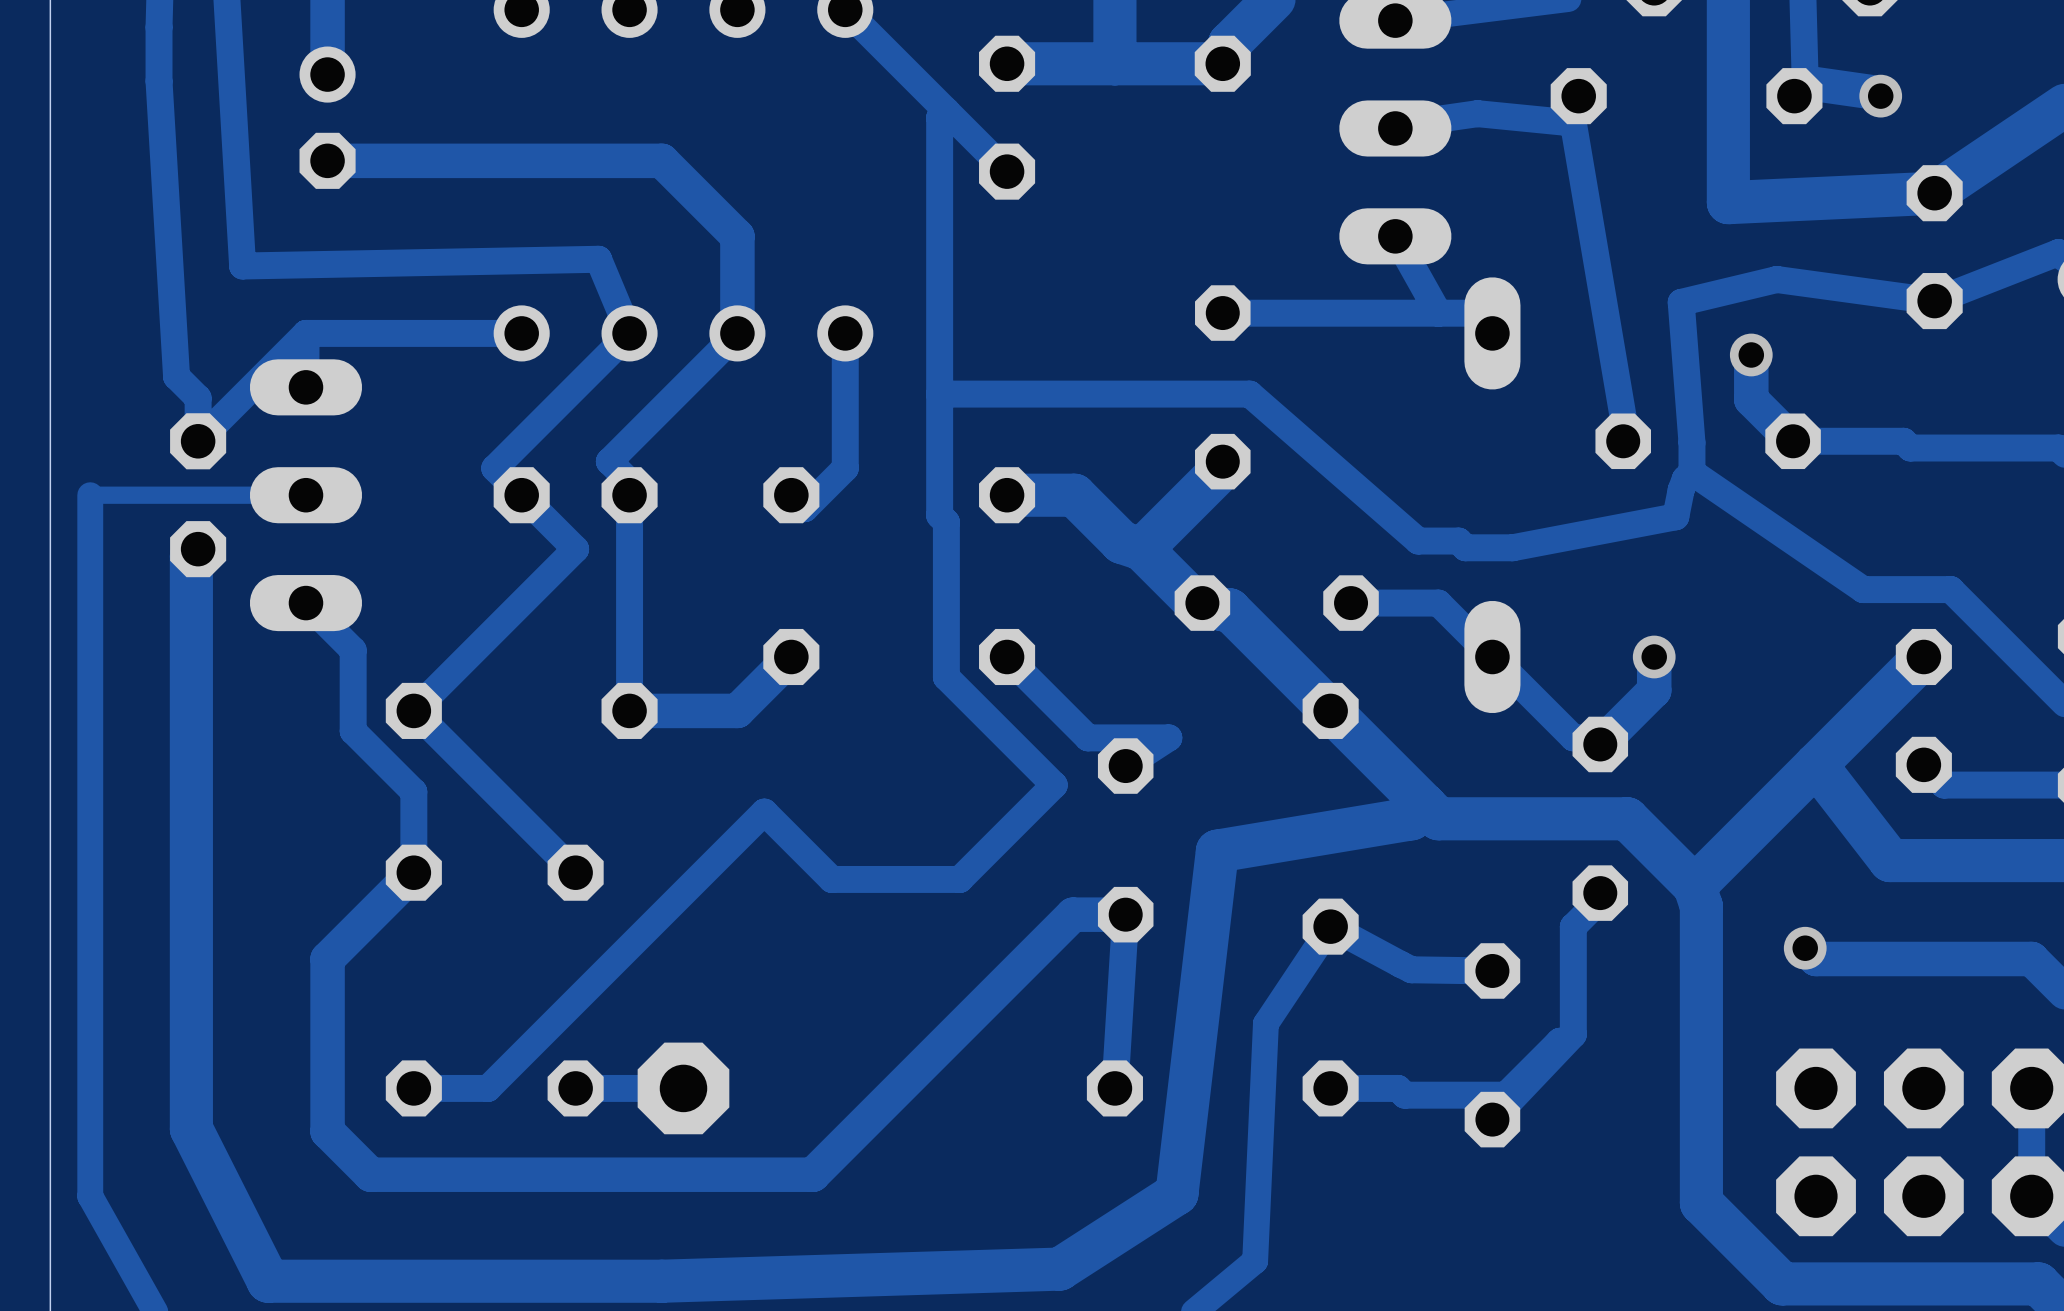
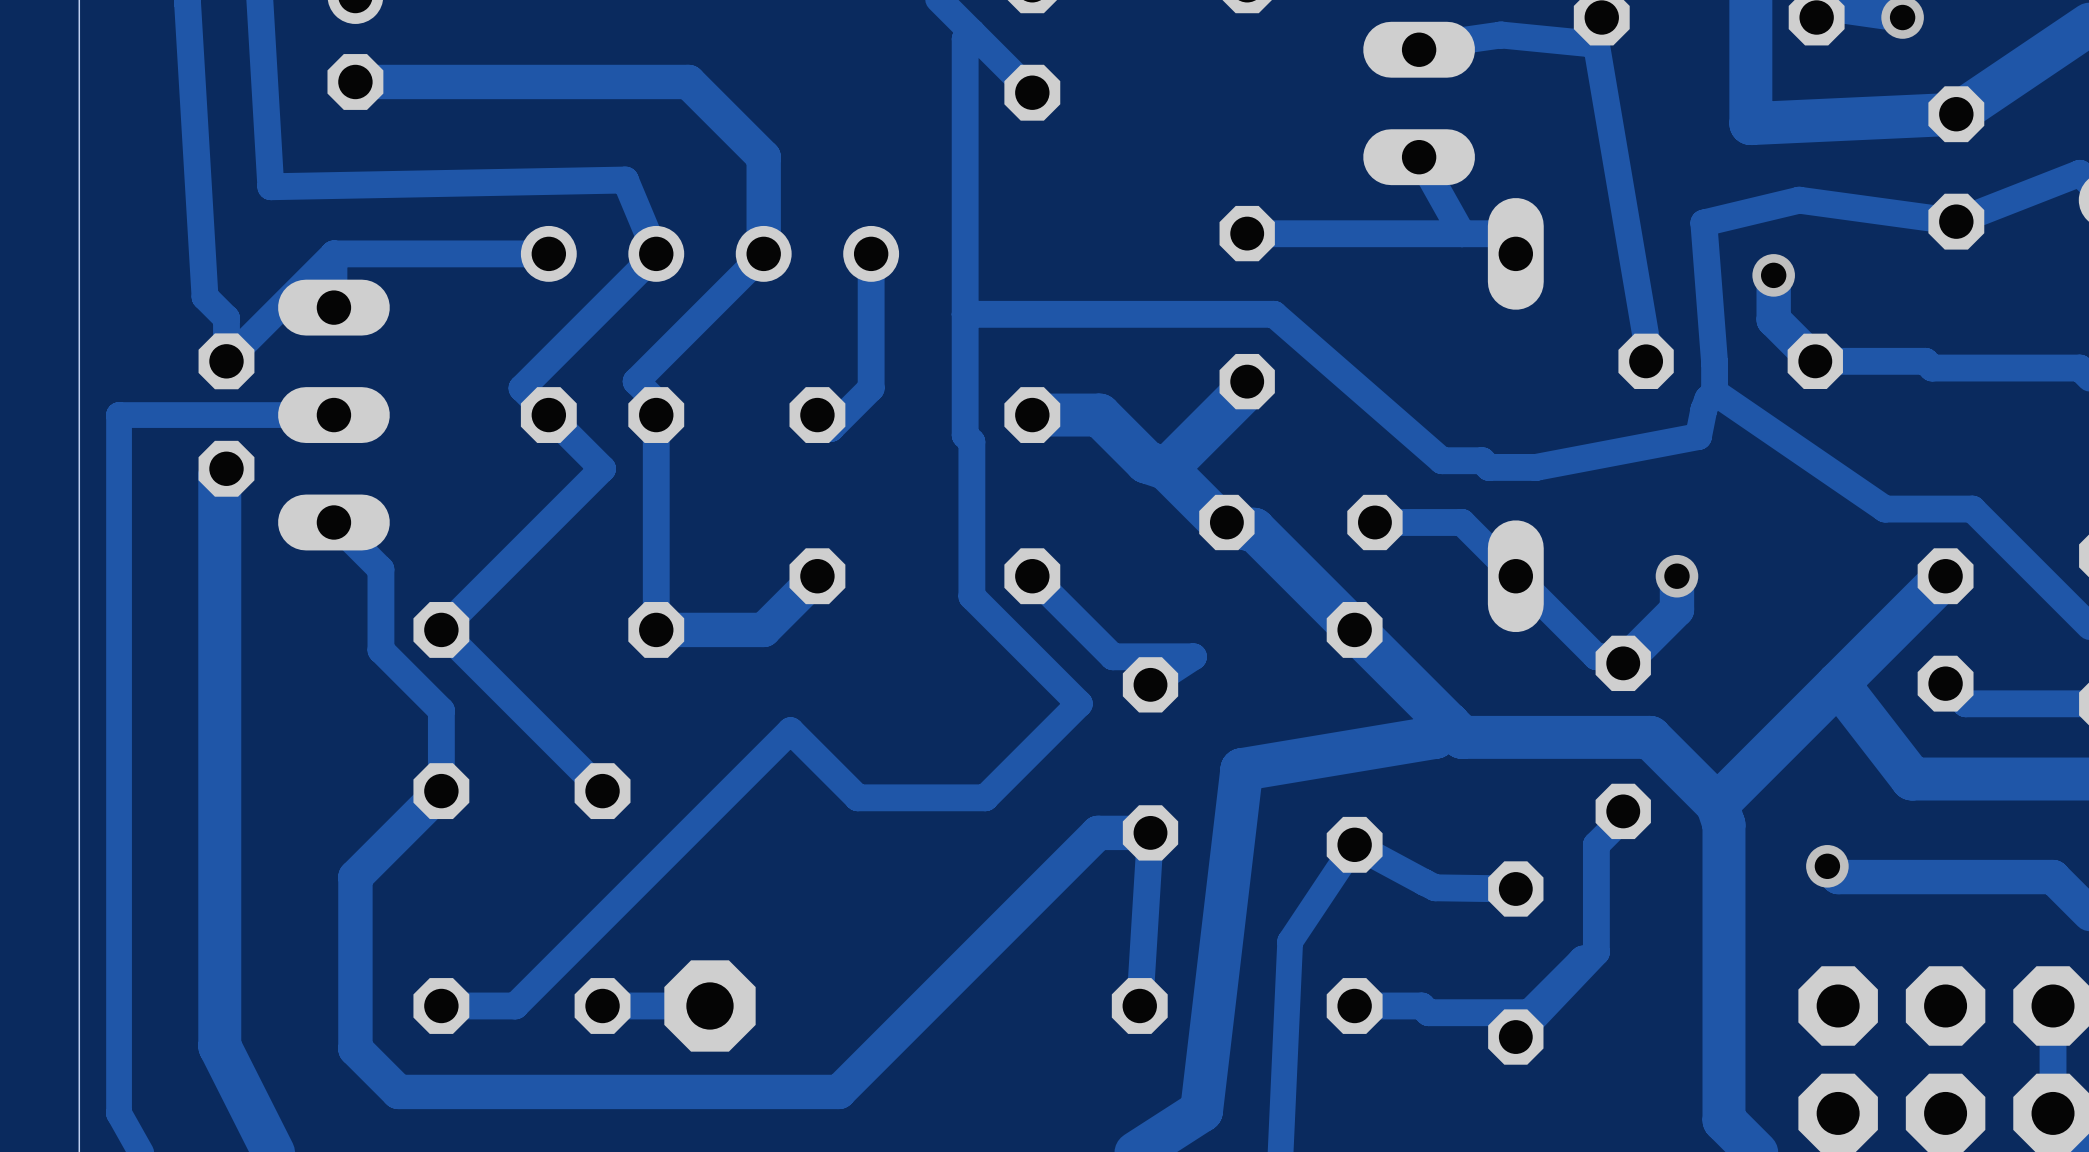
track width: thin (305, 495) (90, 495) -> thick (333, 415) (119, 415)

